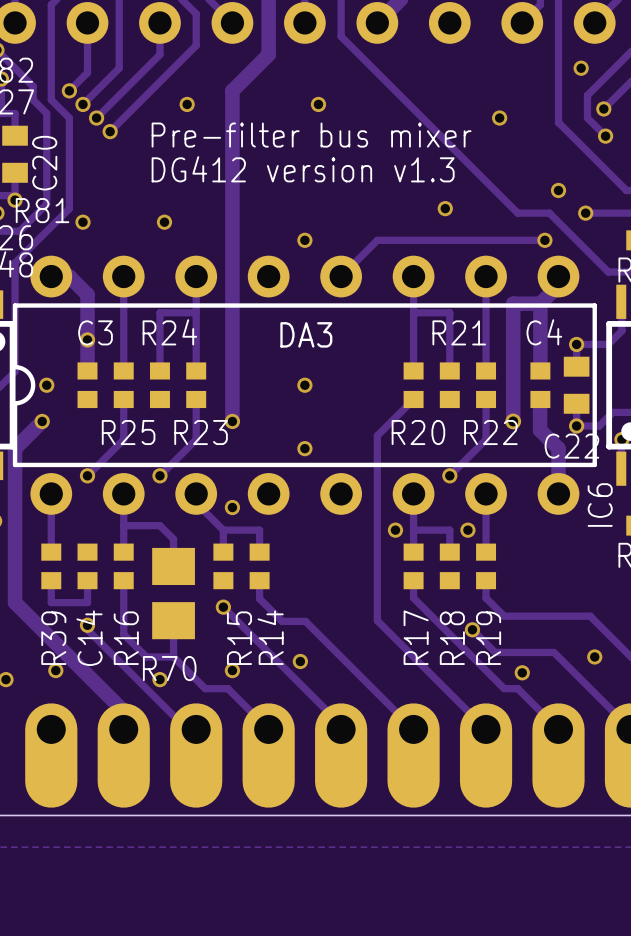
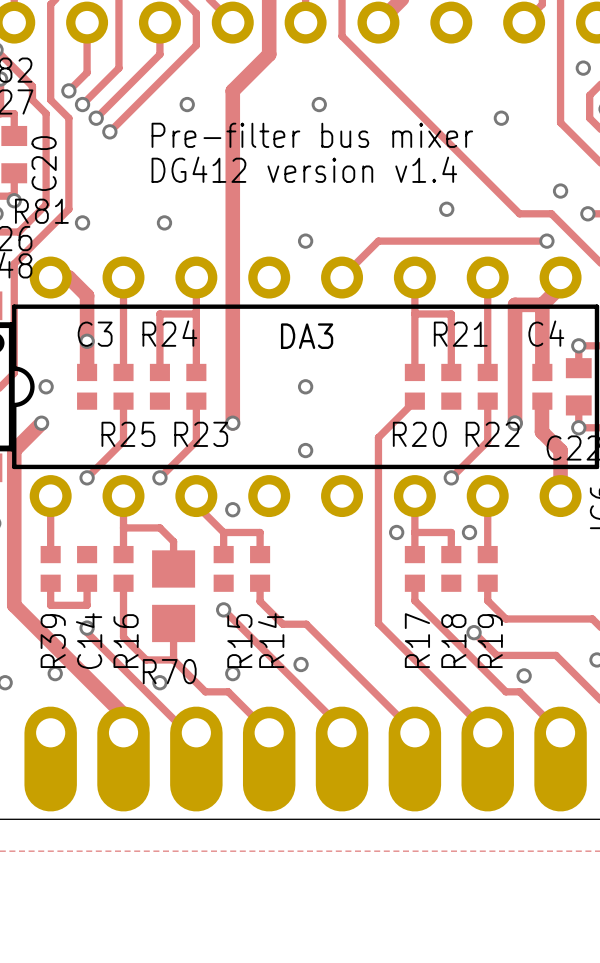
text: DG412 version v1.3 (303, 169) -> DG412 version v1.4 (304, 169)

